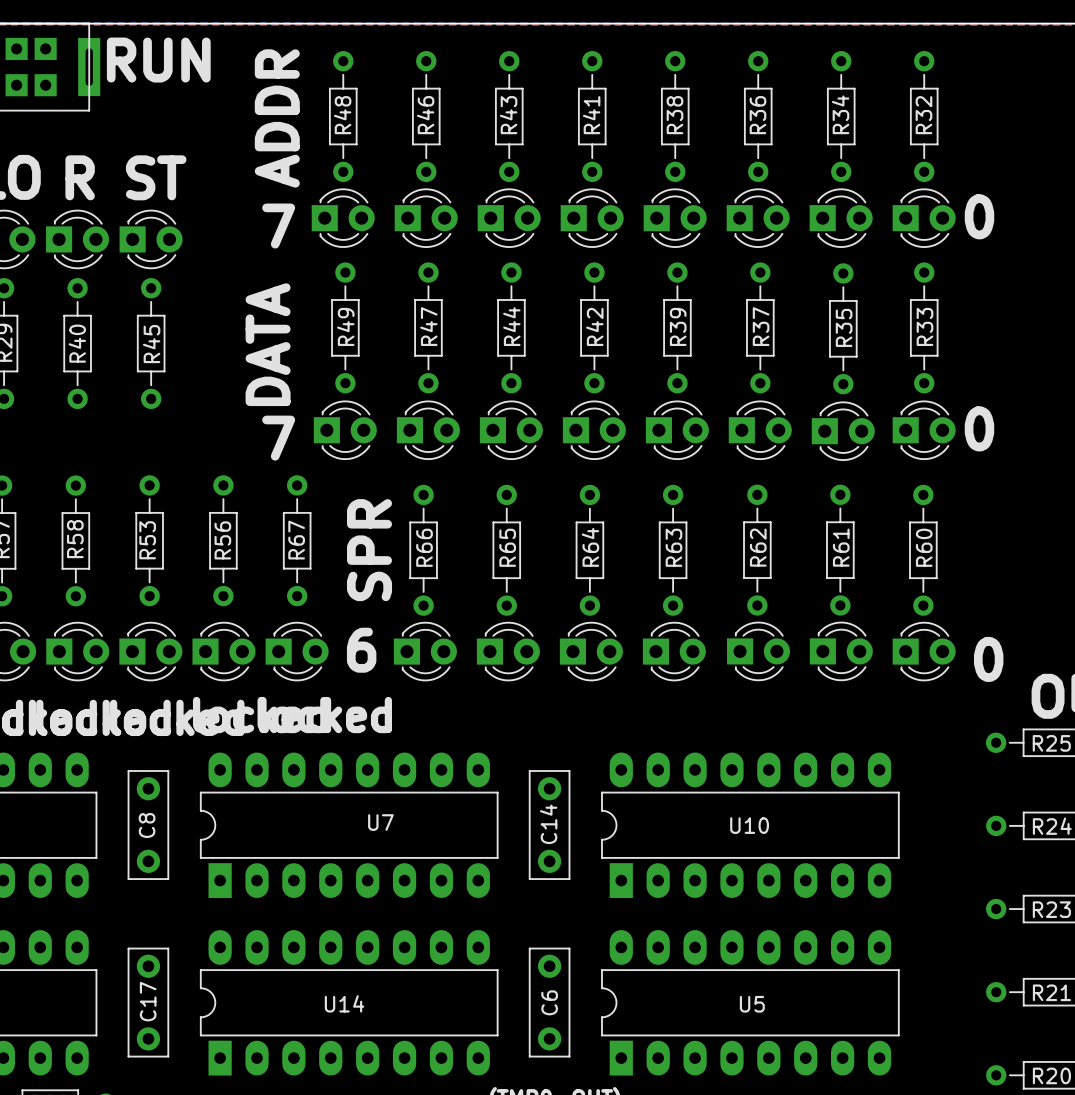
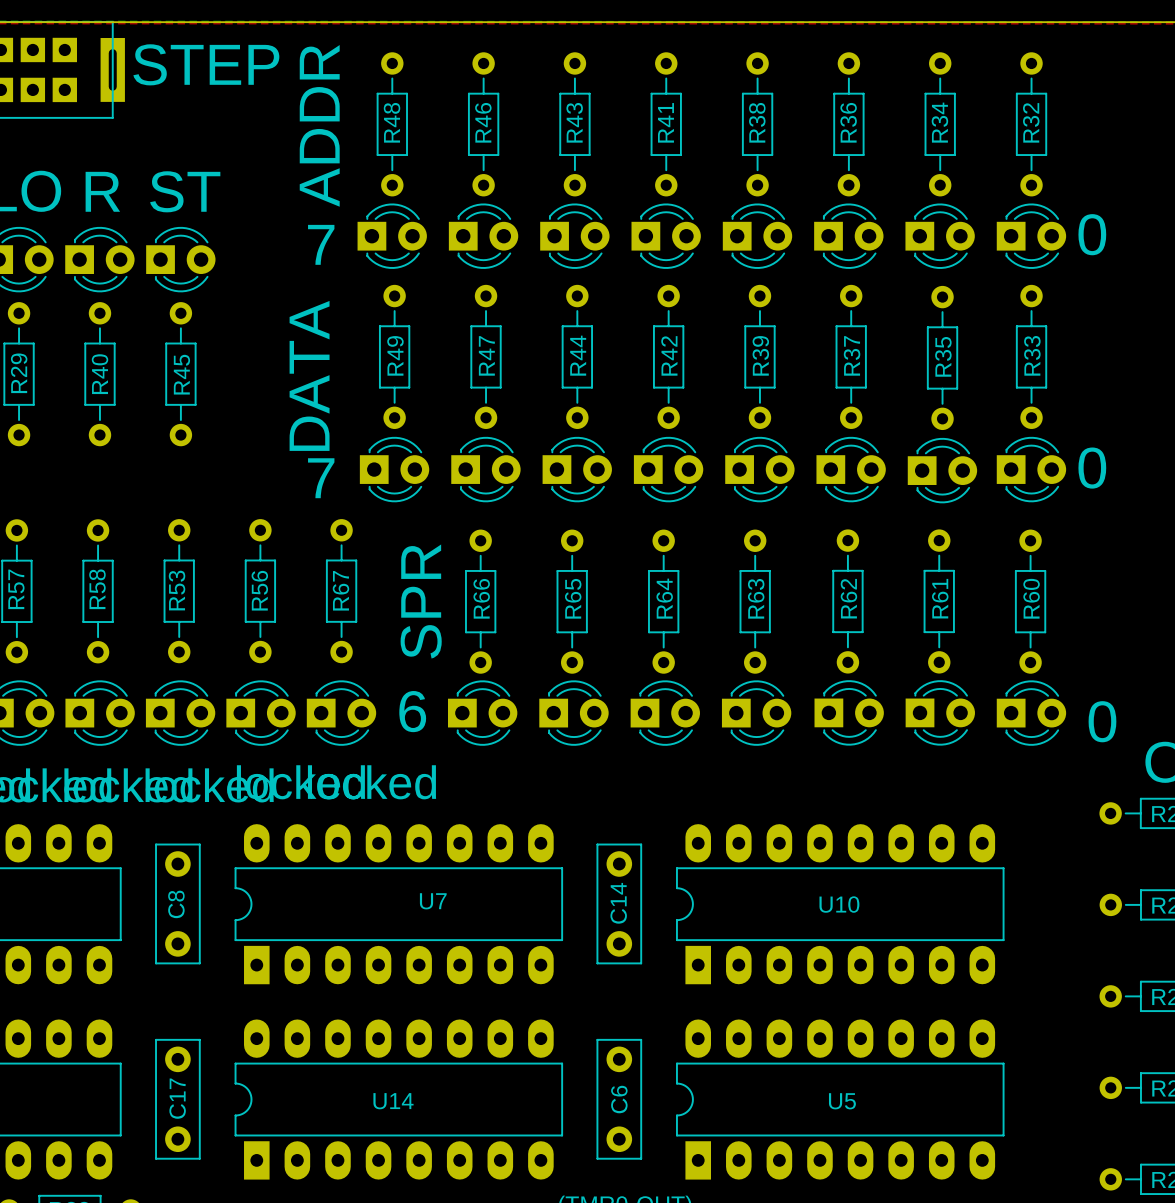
text: RUN (158, 60) -> none
text: none -> STEP (206, 64)

